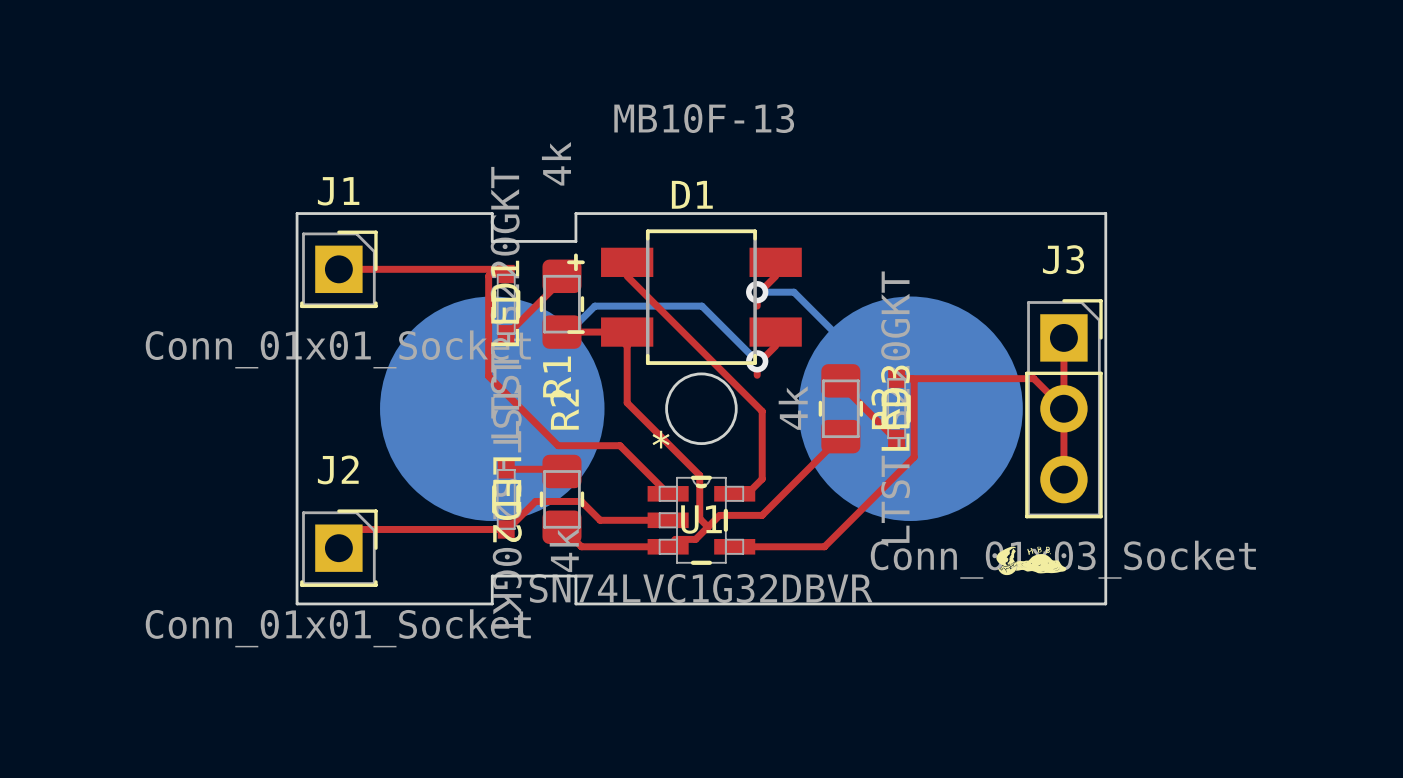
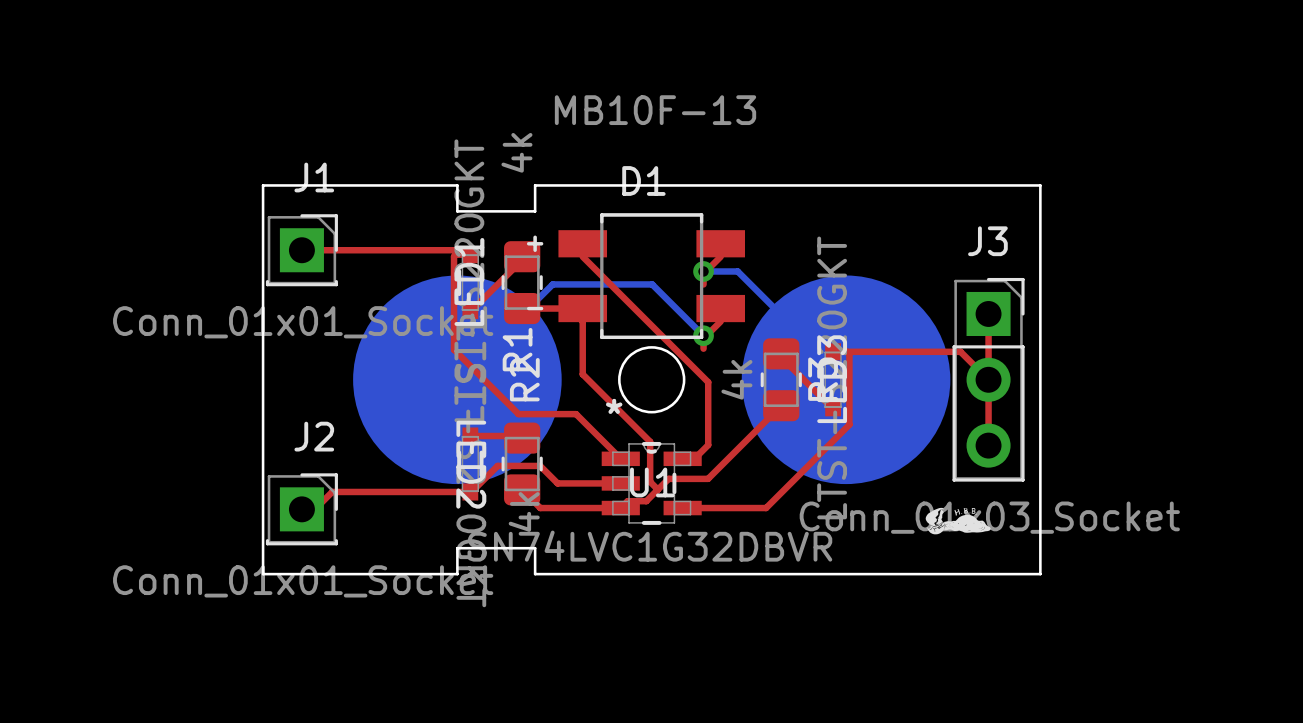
board edge: (492, 213) (297, 213) (297, 603) (492, 603) -> (457, 198) (457, 185) (263, 185) (263, 574) (457, 574) (457, 561)
board edge: (575, 213) (1105, 213) (1105, 603) (575, 603) -> (535, 198) (535, 185) (1040, 185) (1040, 574) (535, 574) (535, 561)
board edge: (492, 227) (492, 241) (575, 241) (575, 227) -> (457, 211) (535, 211)
J1 position: (338, 269) -> (301, 250)
J2 position: (338, 548) -> (301, 509)
board edge: (492, 590) (492, 576) (575, 576) (575, 590) -> (457, 548) (535, 548)

